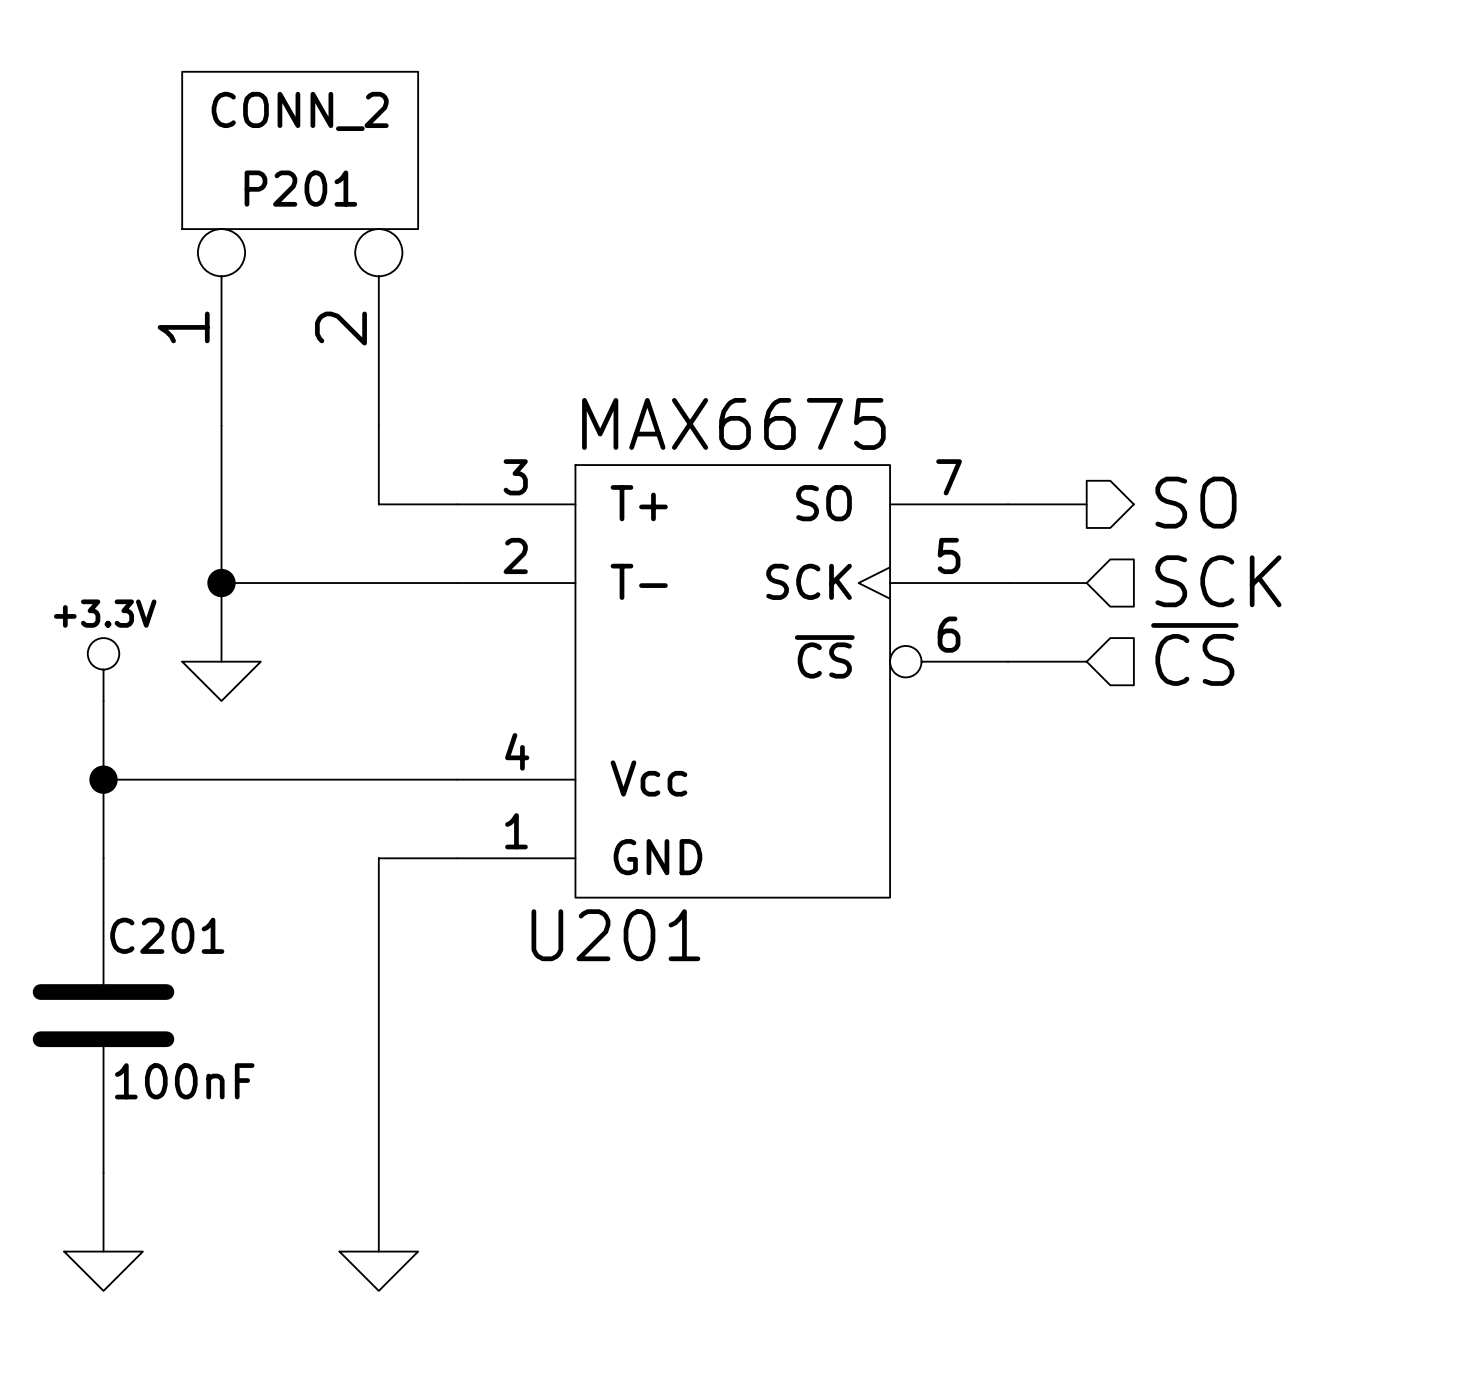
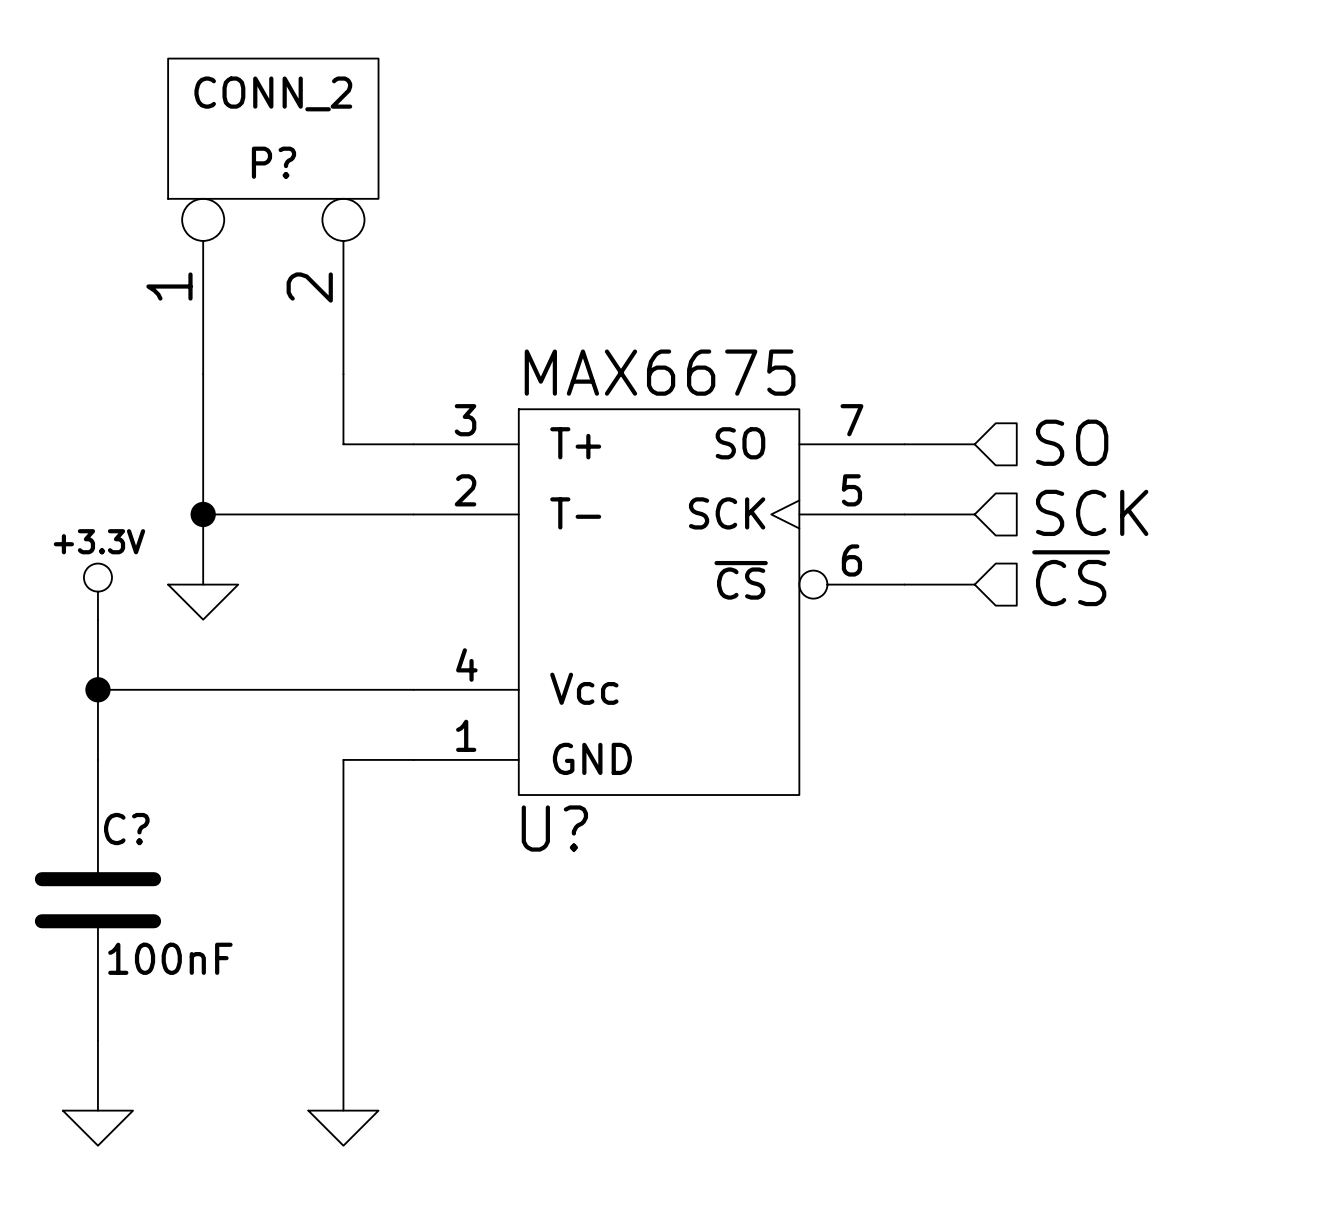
P201 name: P201 (300, 188) -> P? (273, 162)
hierarchical label shape: output (1195, 502) -> input (1072, 442)
C201 name: C201 (167, 935) -> C? (126, 829)
U201 name: U201 (615, 935) -> U? (554, 828)

